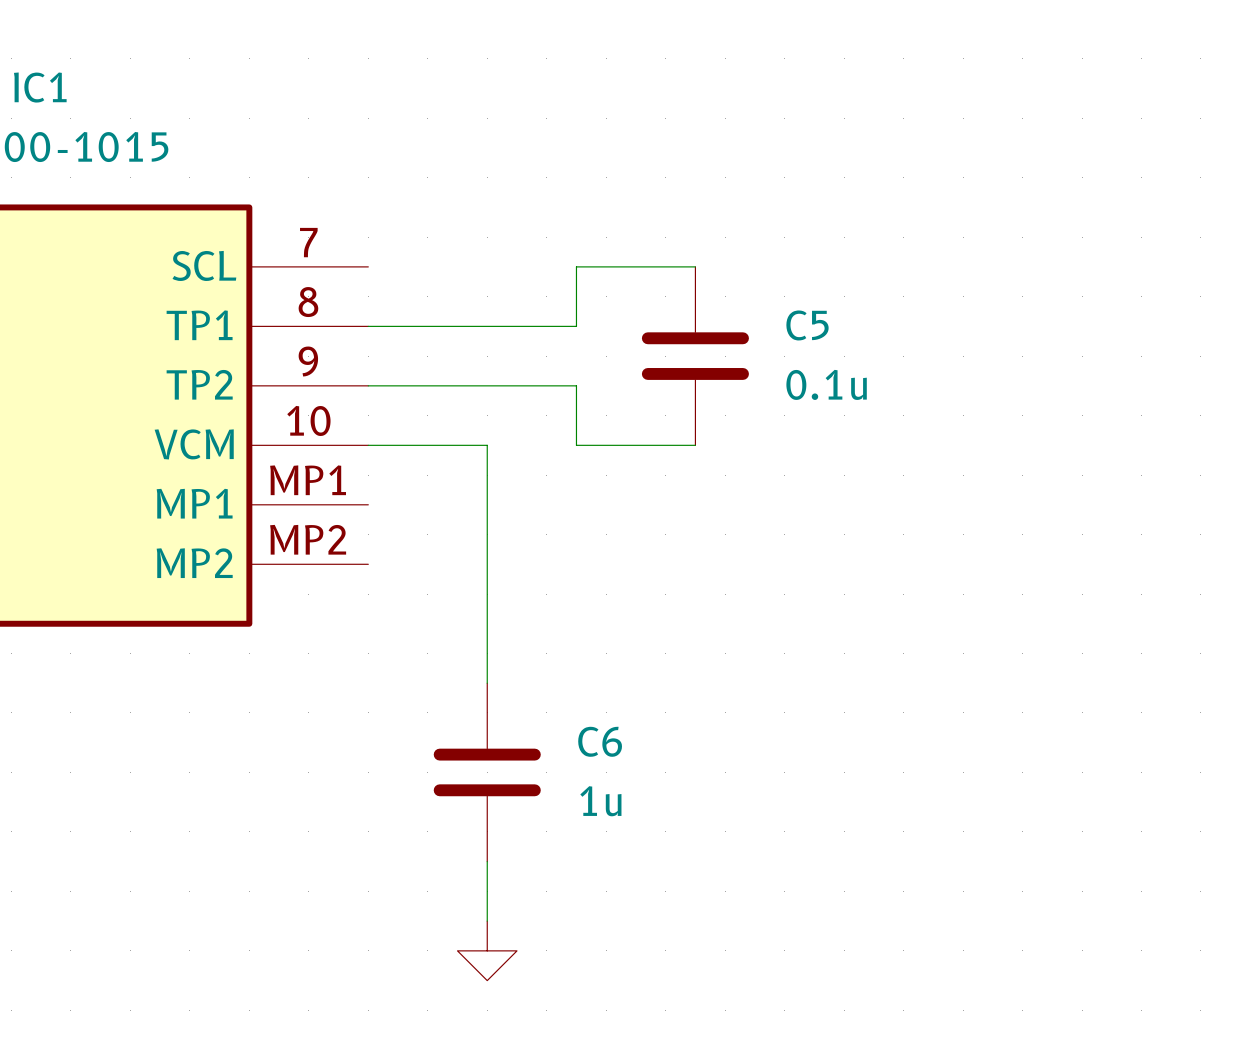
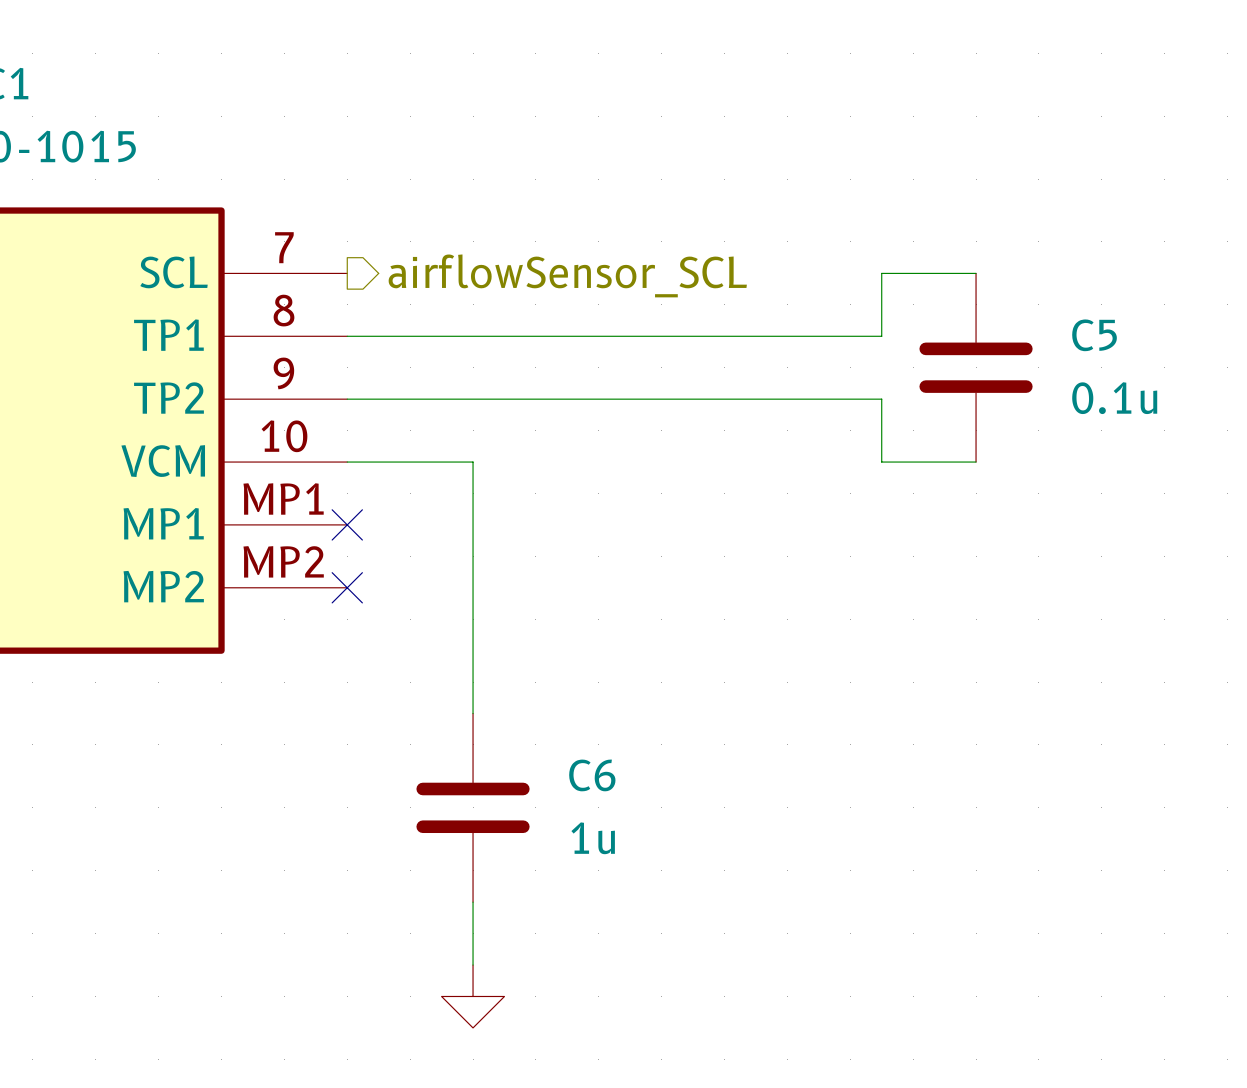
wire: (695, 266) (576, 266) (576, 326) -> (976, 273) (881, 273) (881, 336) (567, 336)
hierarchical label: none -> airflowSensor_SCL (567, 275)
C5 position: (695, 356) -> (976, 367)
wire: (576, 385) (576, 445) (695, 445) -> (567, 399) (881, 399) (881, 462) (976, 462)
no-connect mark: none -> (347, 524)
no-connect mark: none -> (347, 587)

